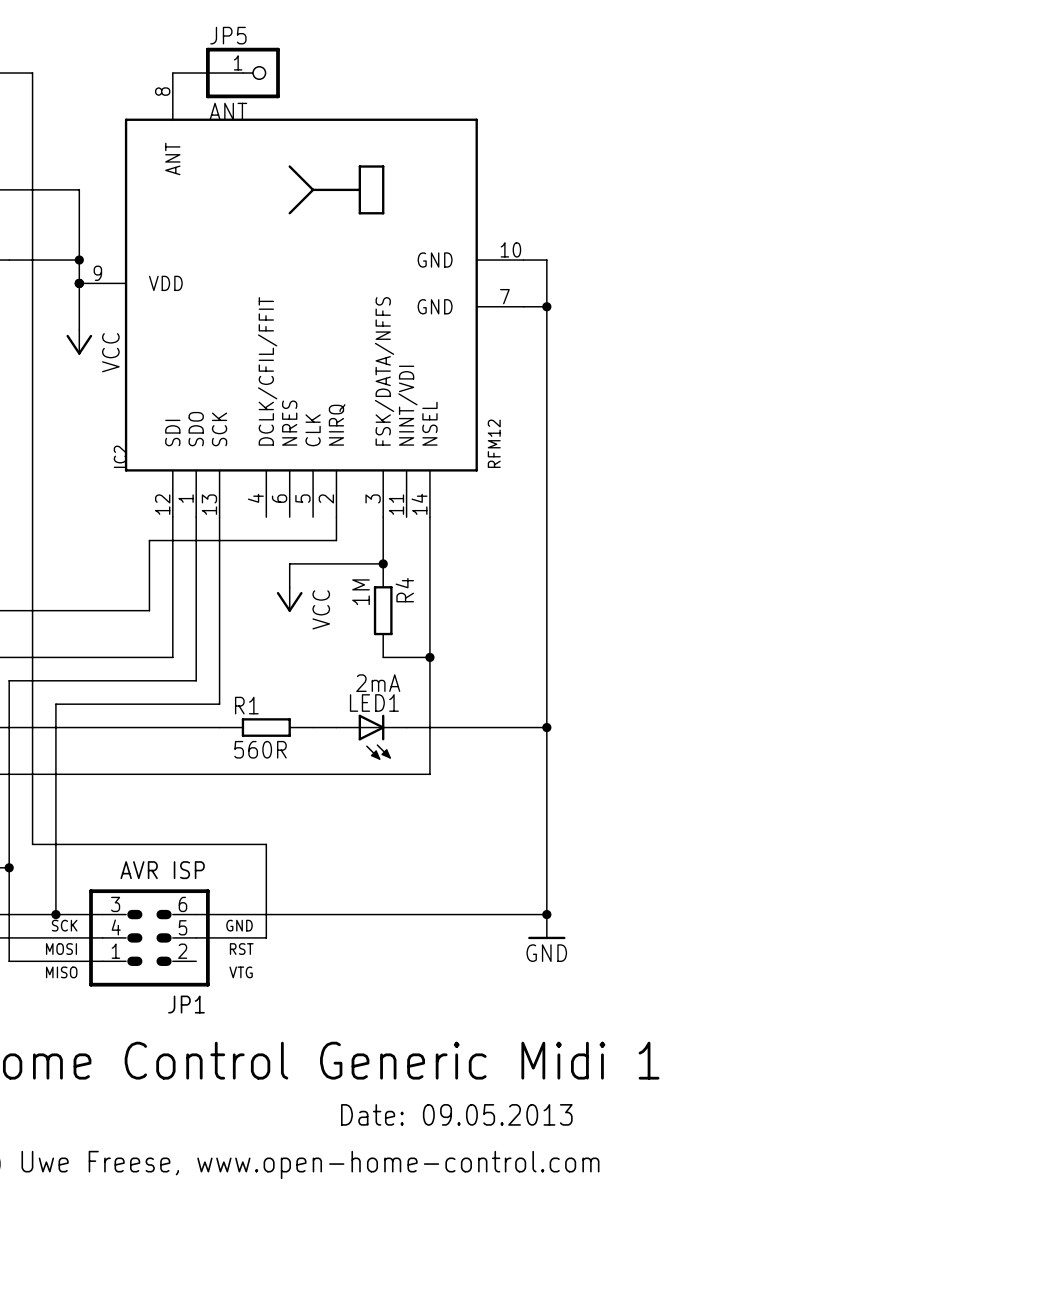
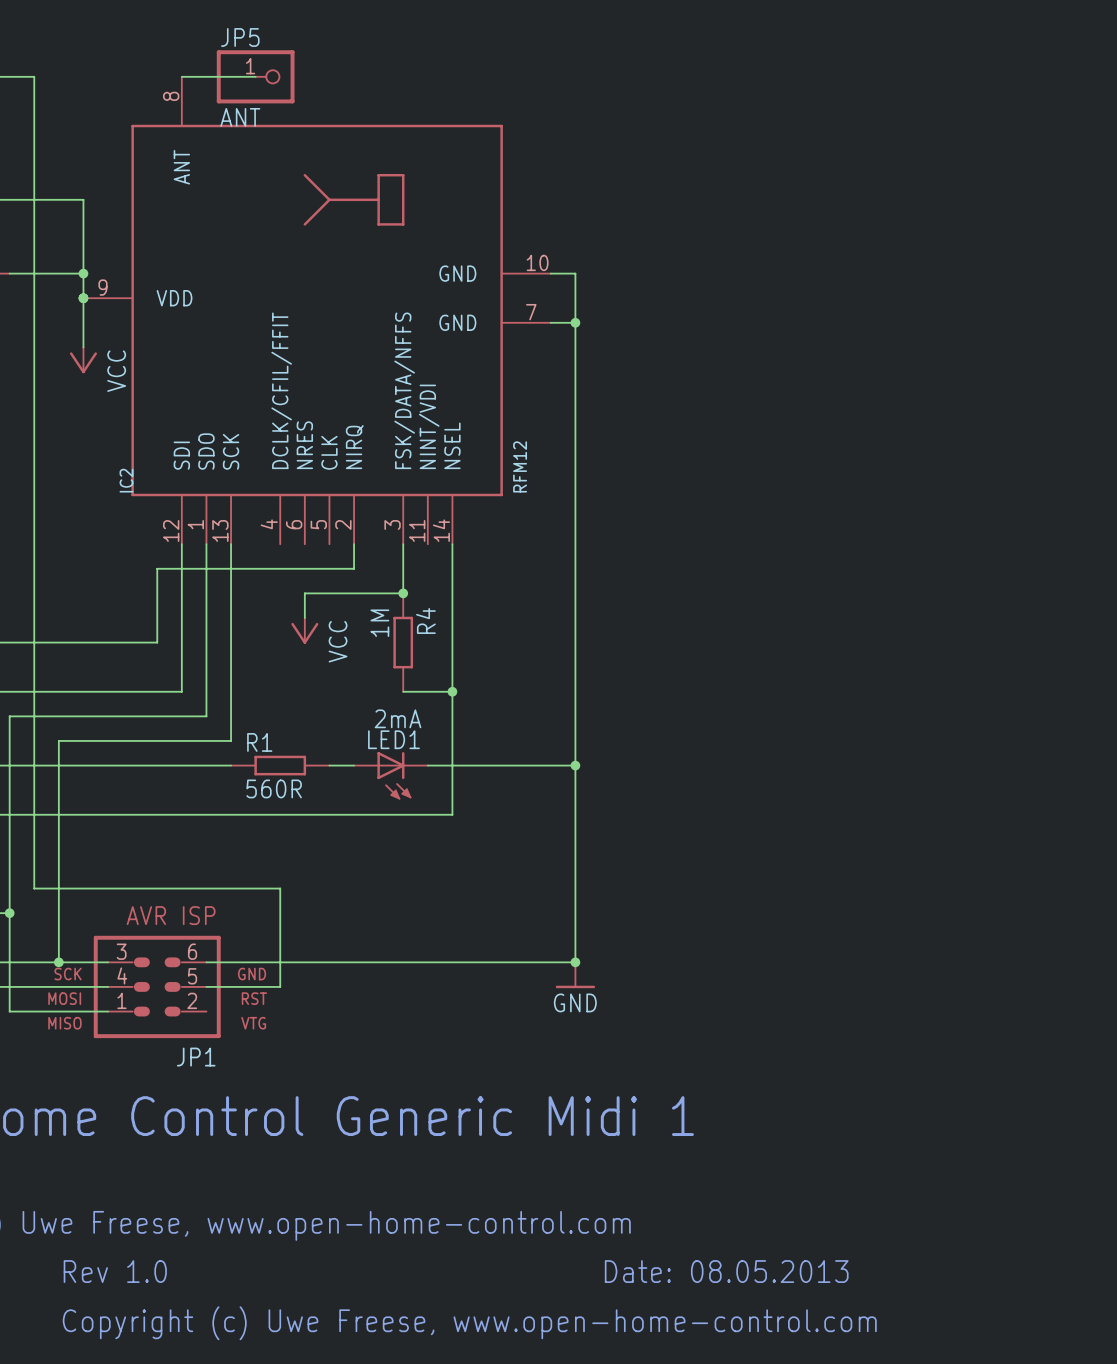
text: Date: 09.05.2013 (456, 1114) -> none
text: none -> Rev 1.0 (115, 1271)
text: none -> Date: 08.05.2013 (726, 1271)
text: none -> Copyright (c) Uwe Freese, www.open-home-control.com (469, 1323)

